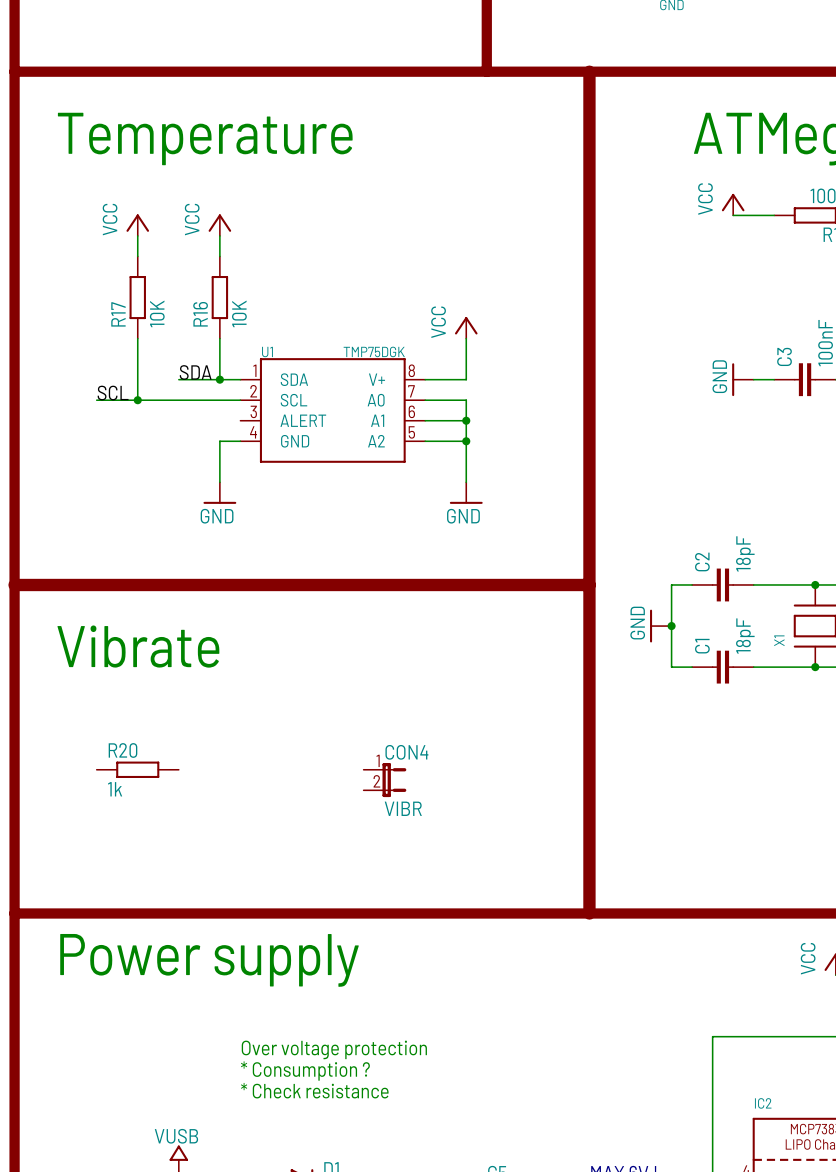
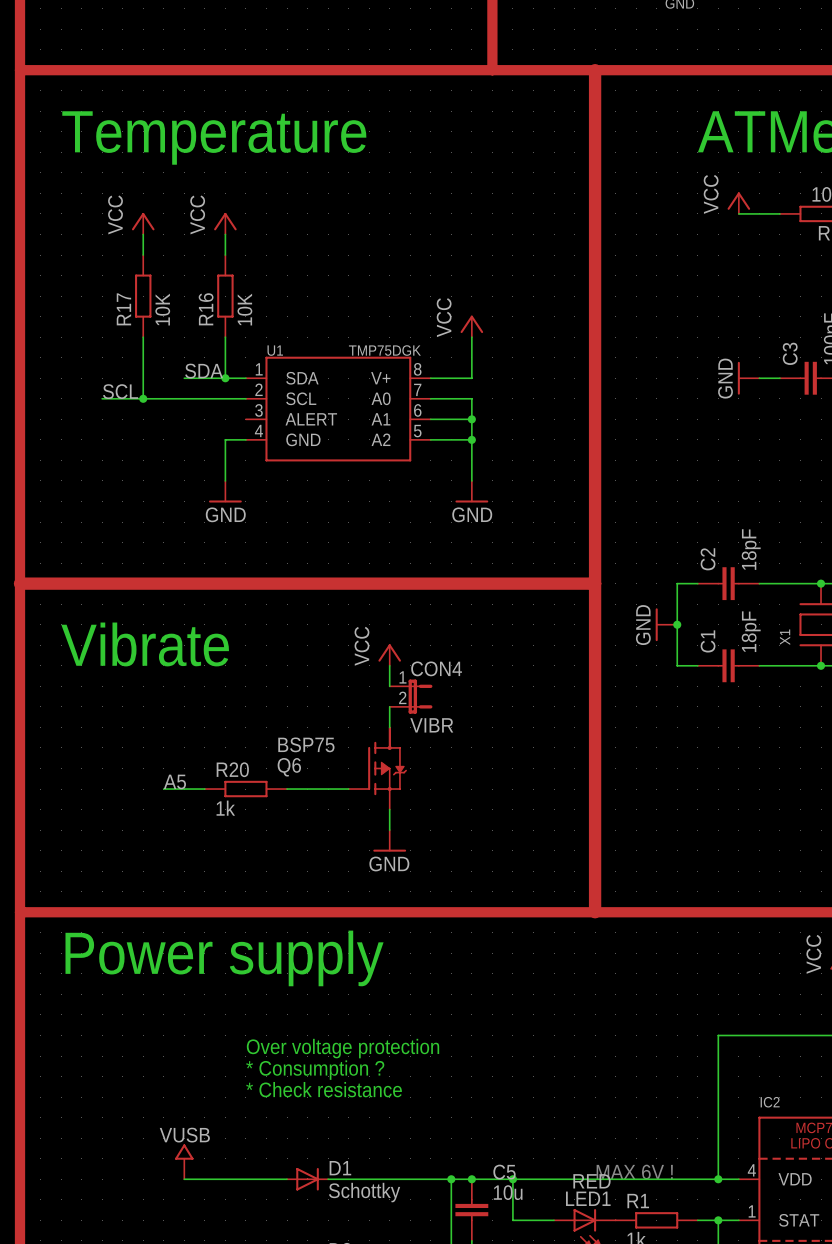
power symbol: none -> VCC (389, 655)
wire: none -> (389, 665) (389, 686)
wire: none -> (389, 706) (389, 727)
R20 position: (137, 769) -> (245, 789)
Q6: none -> BSP75 (377, 768)
CON4 position: (384, 780) -> (411, 696)
label: none -> A5 (174, 781)
wire: none -> (163, 789) (204, 789)
wire: none -> (287, 789) (348, 789)
wire: none -> (389, 809) (389, 830)
power symbol: none -> GND (389, 840)

